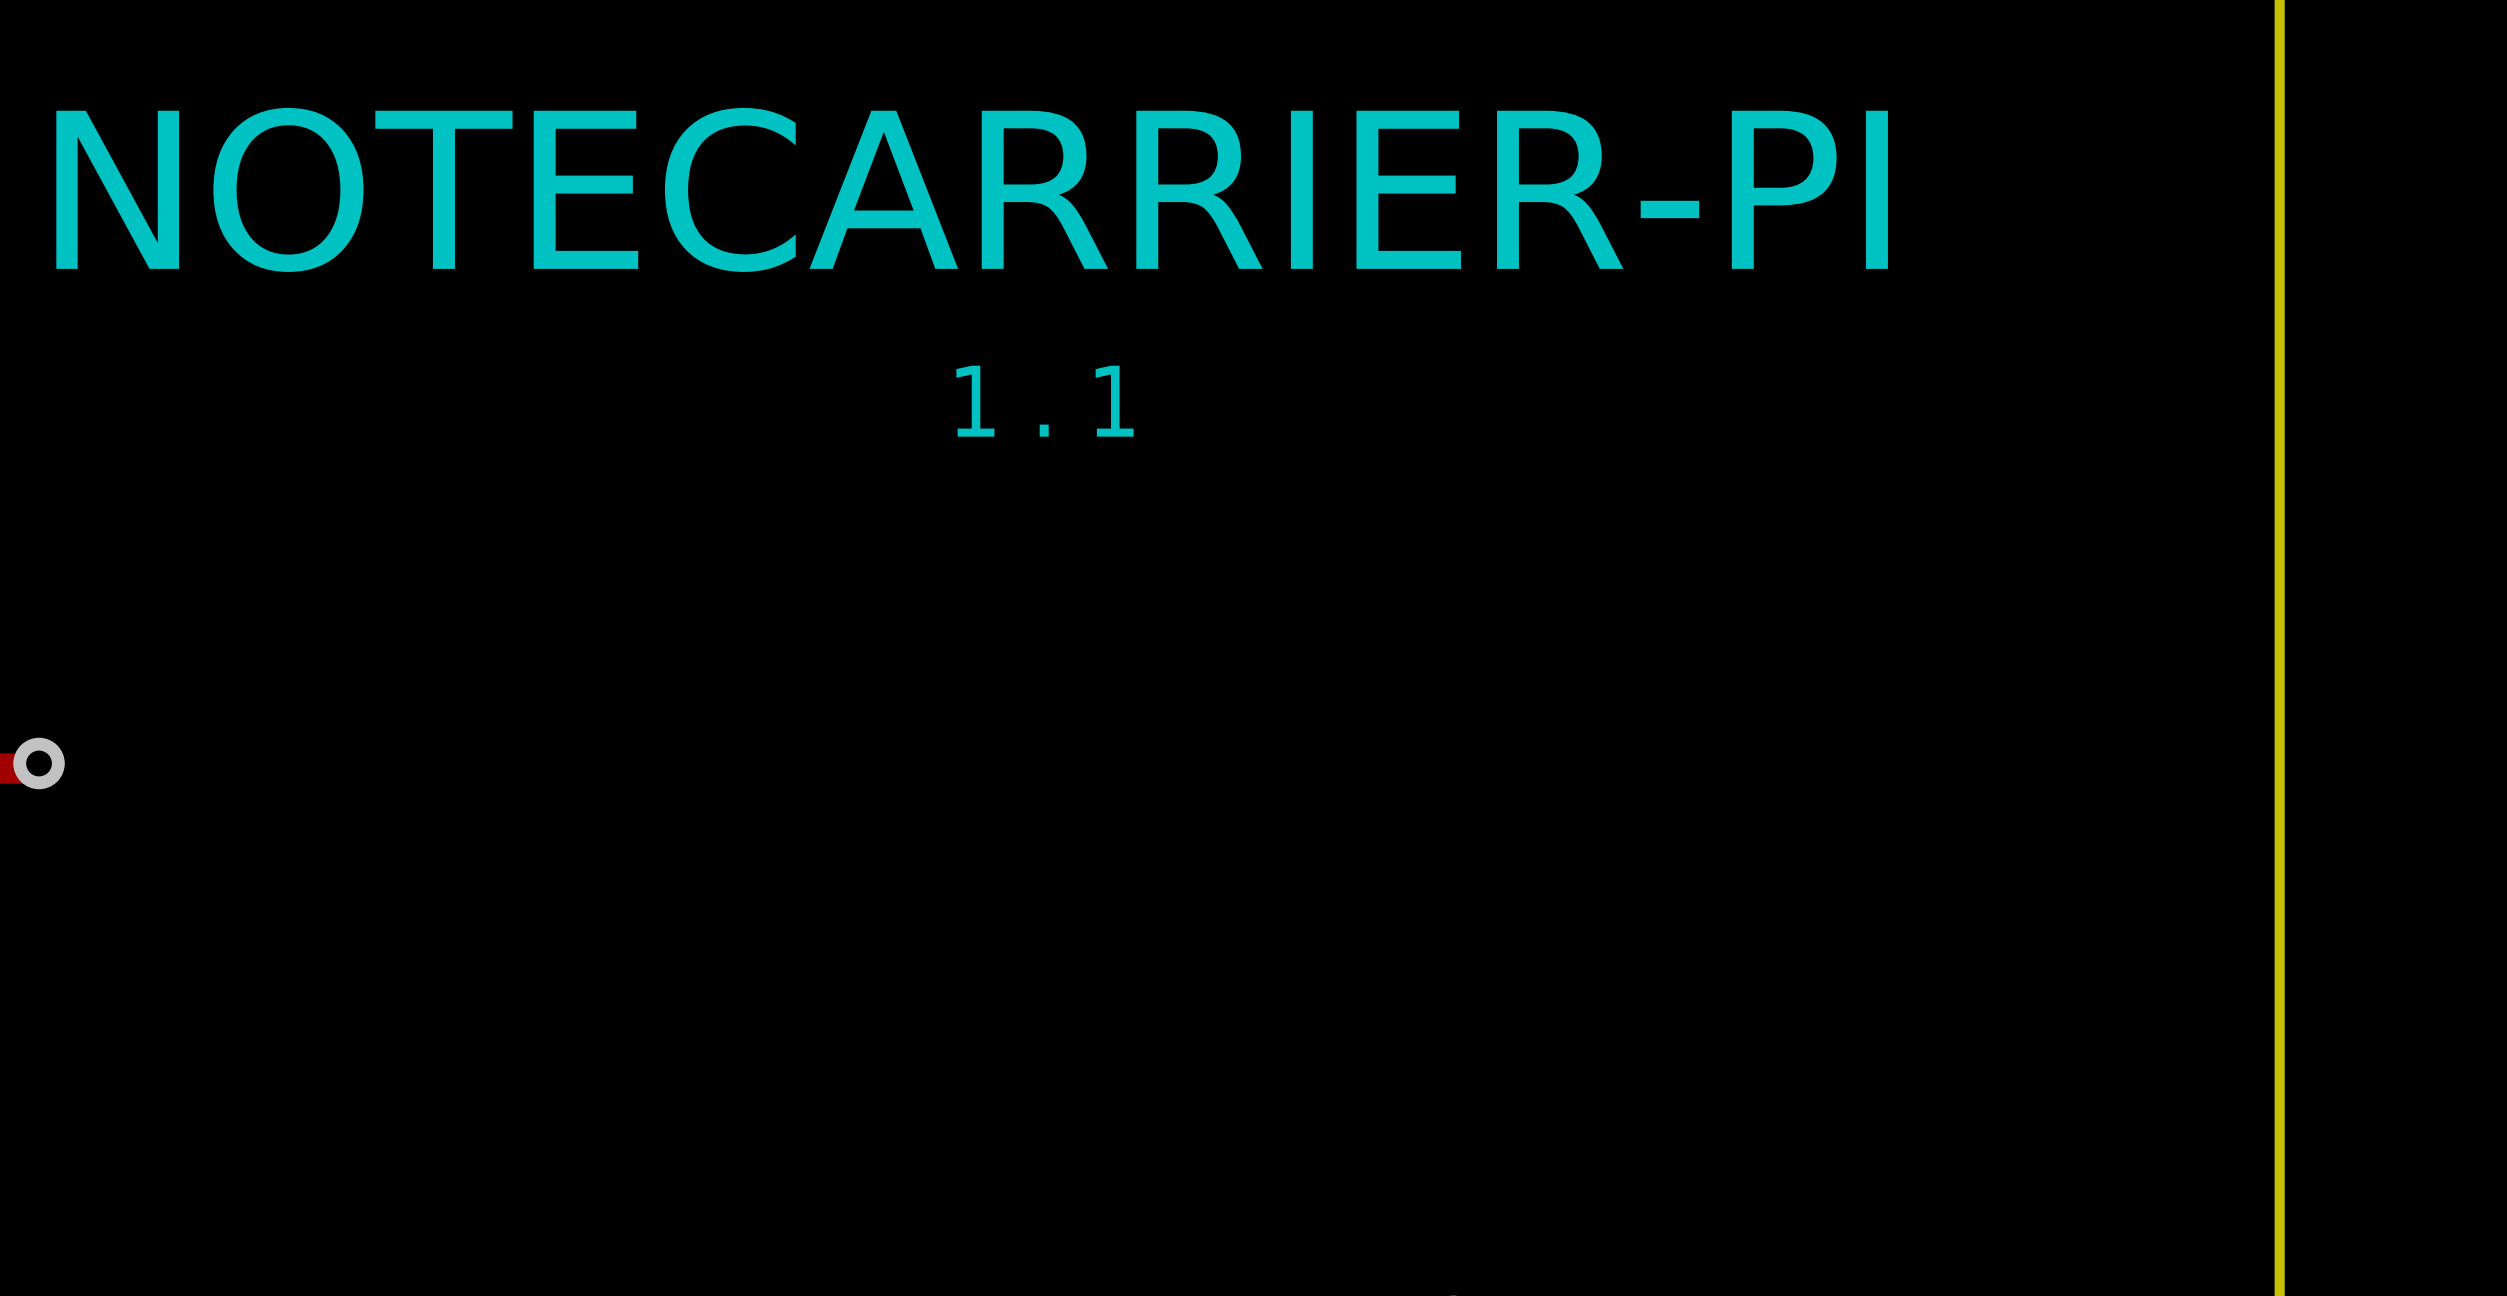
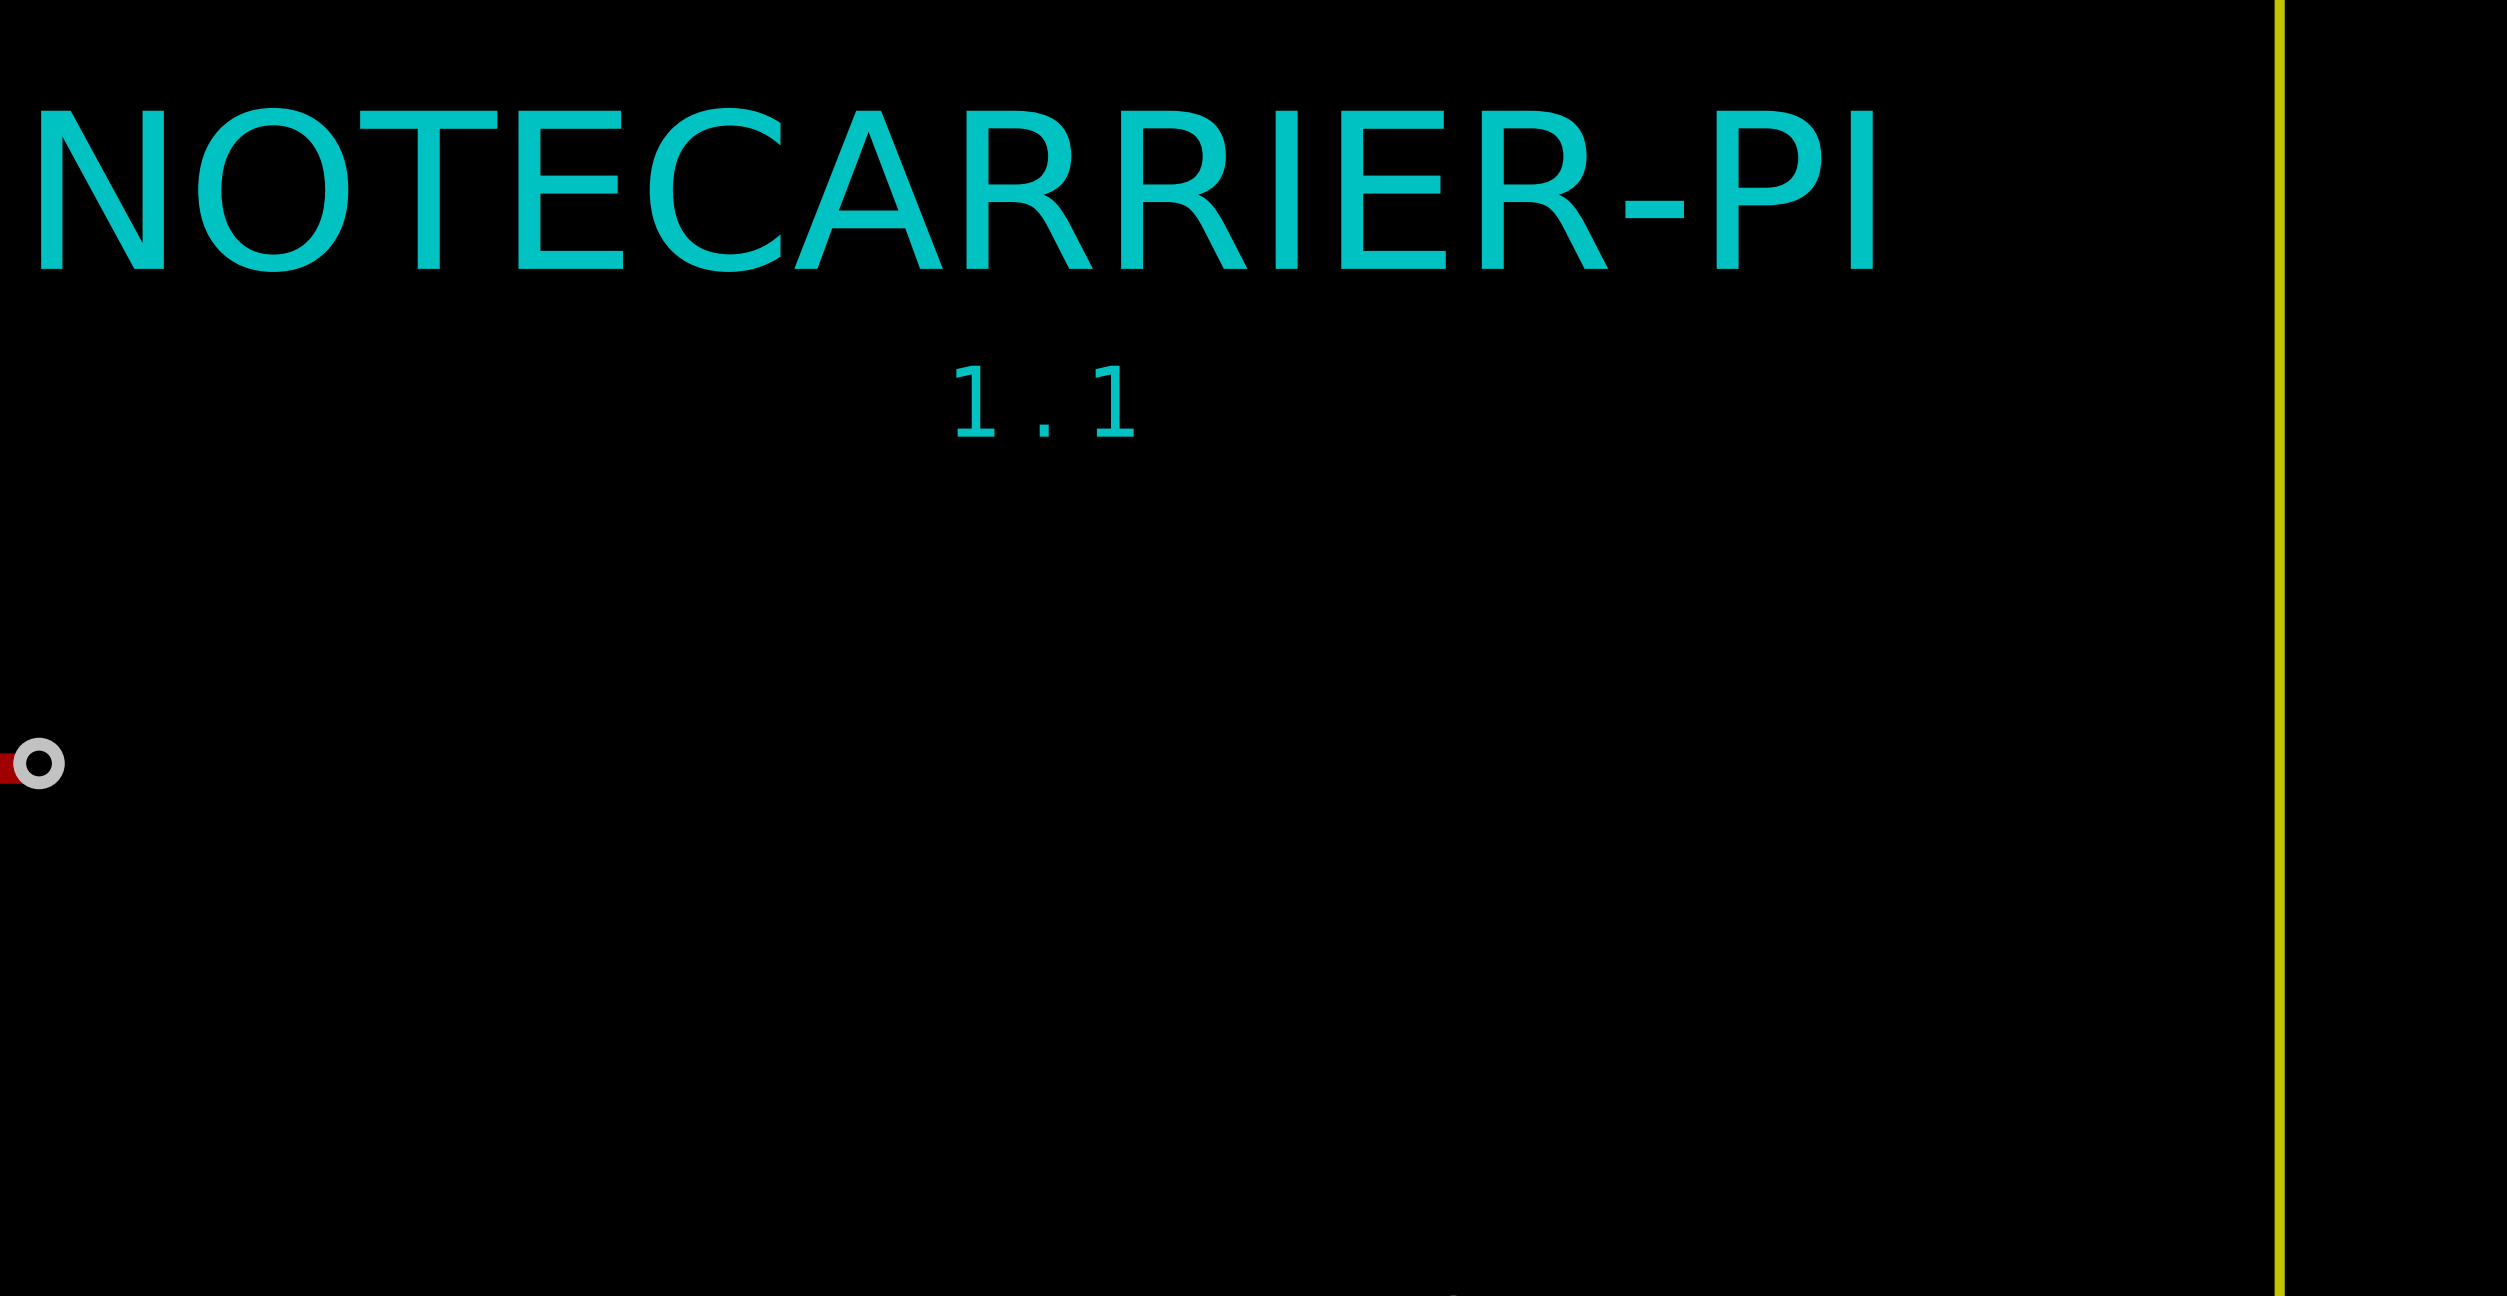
text position: NOTECARRIER-PI (972, 189) -> NOTECARRIER-PI (956, 189)

